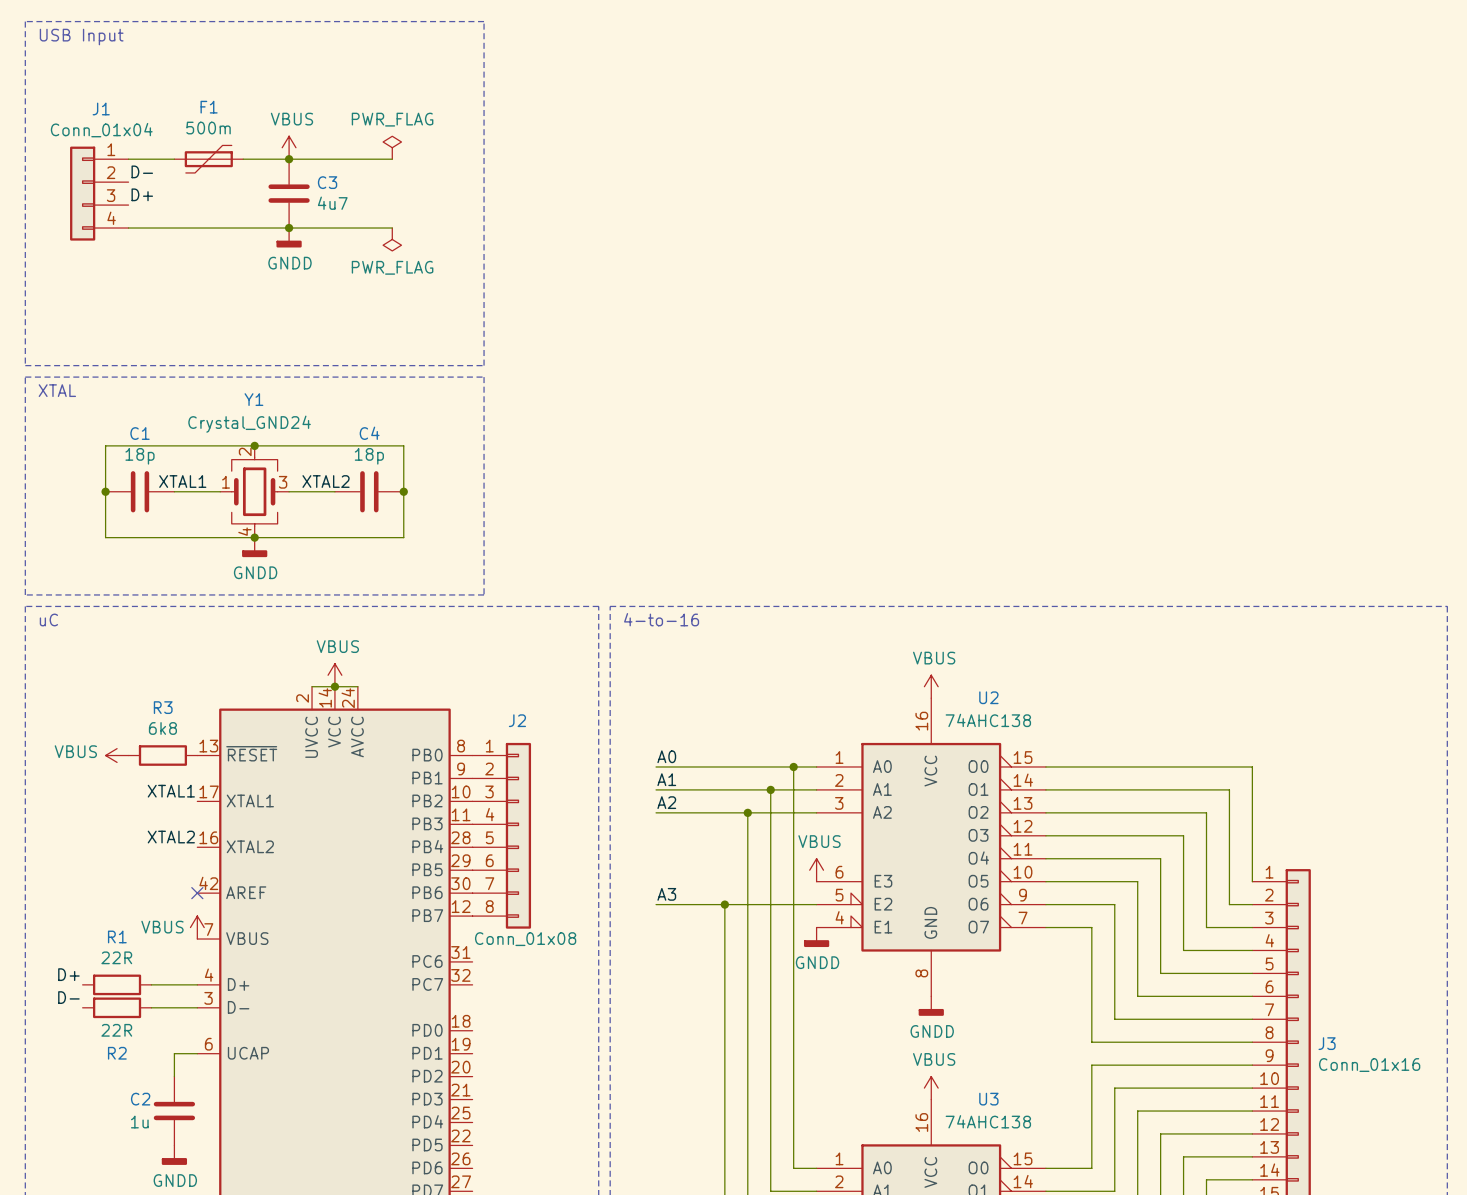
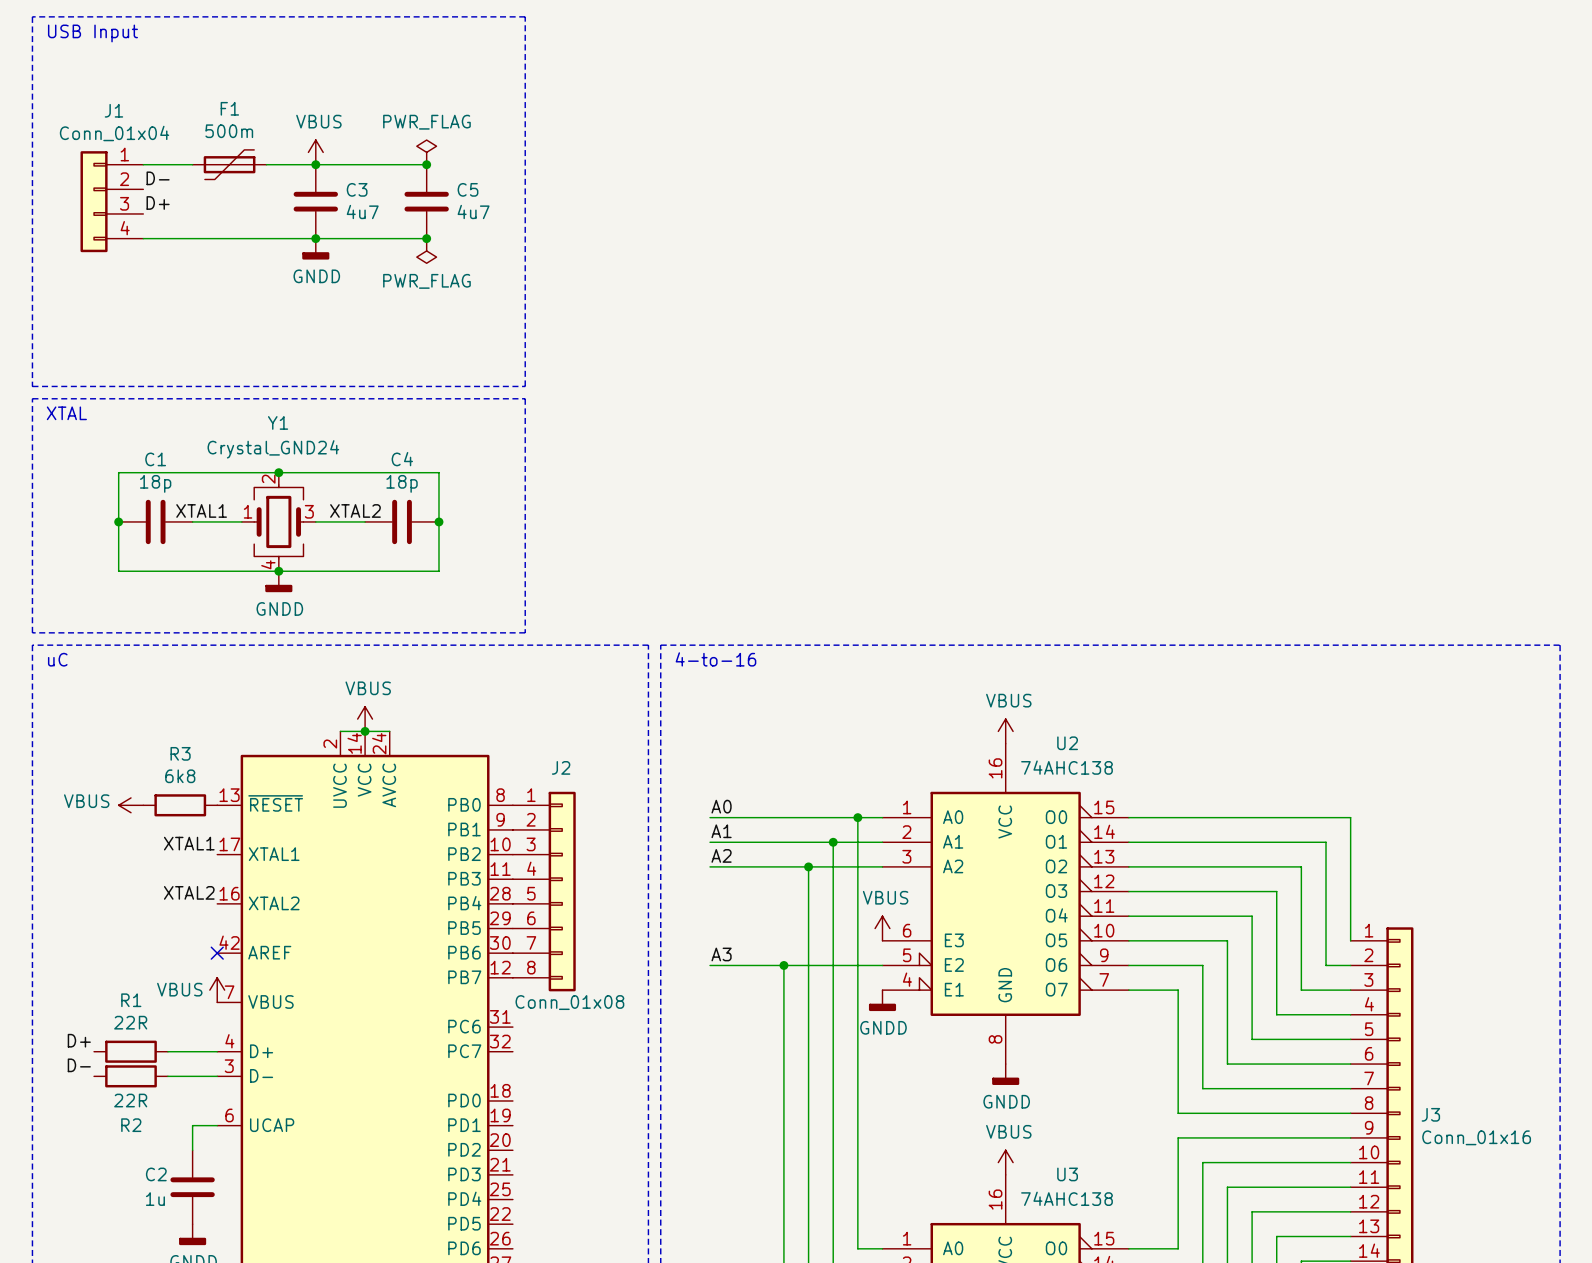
junction: none -> (426, 164)
C5: none -> 4u7 (426, 201)
junction: none -> (426, 238)

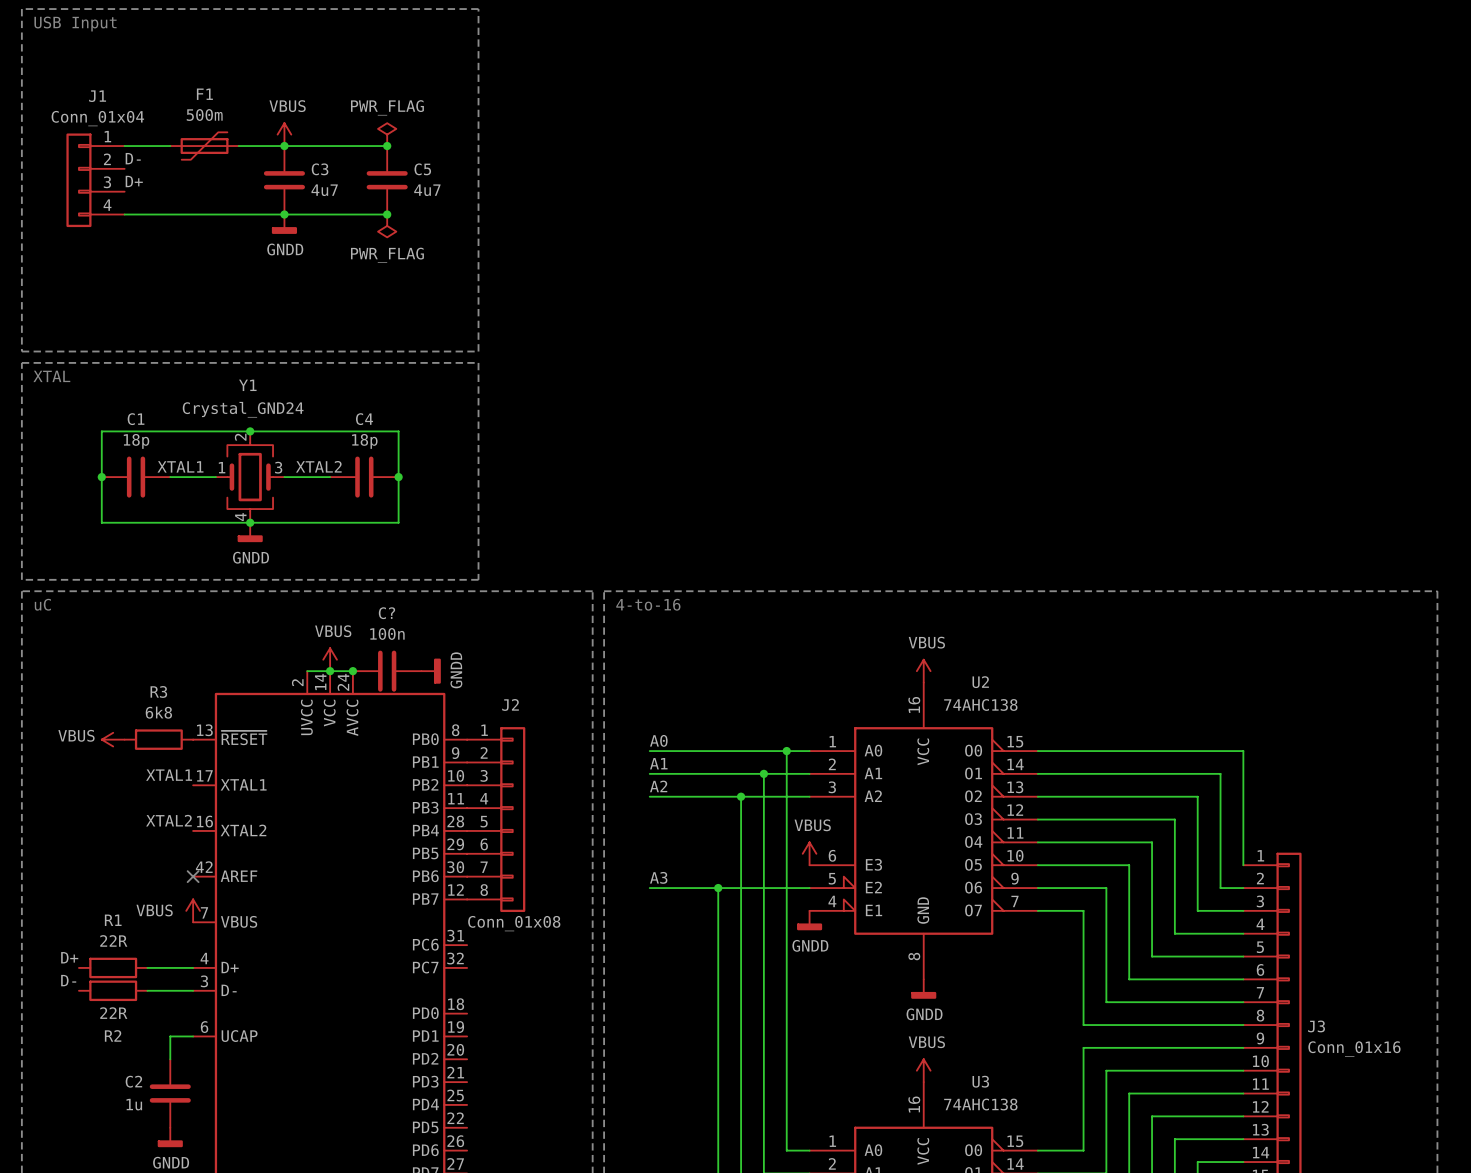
junction: none -> (352, 671)
C?: none -> 100n (387, 671)
power symbol: none -> GNDD (431, 671)

